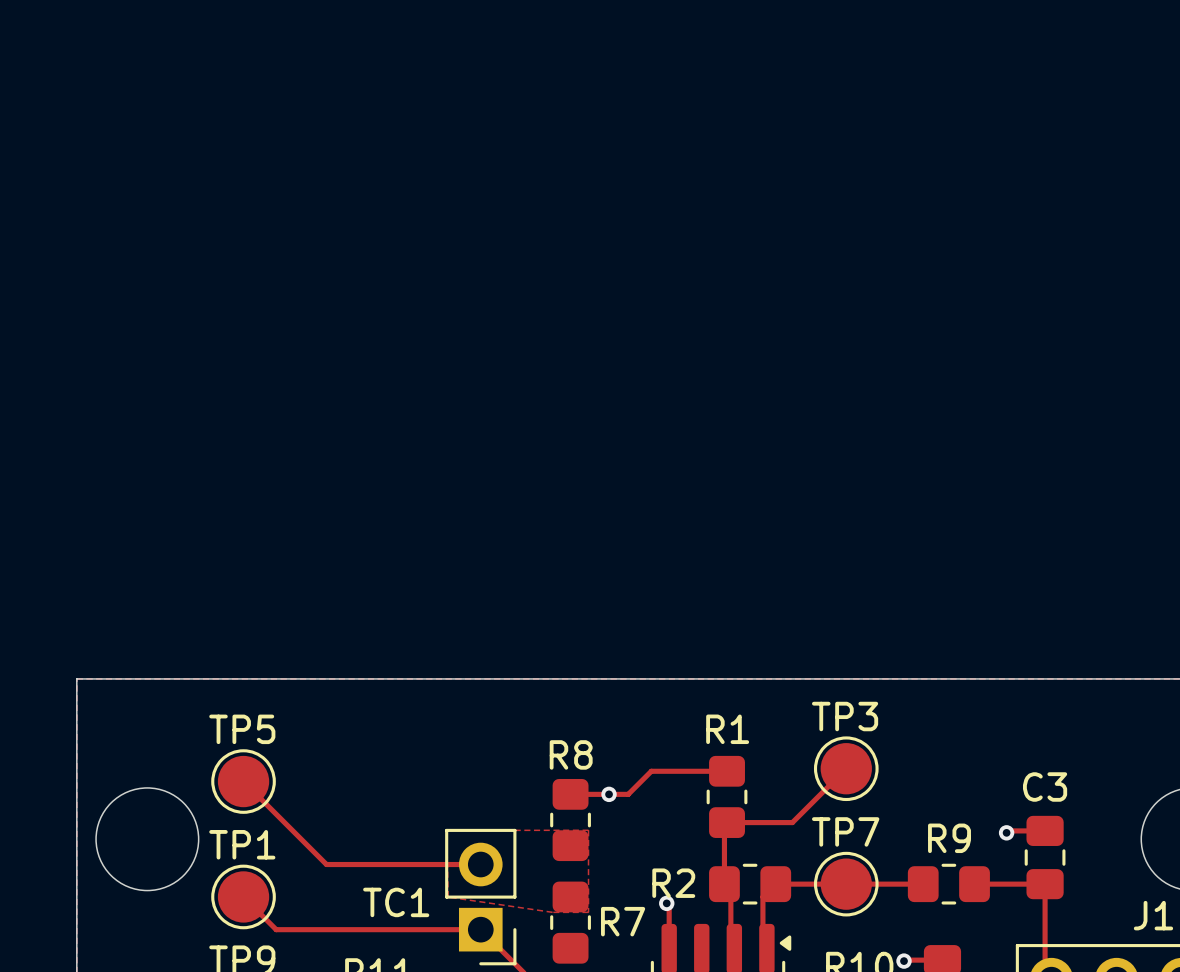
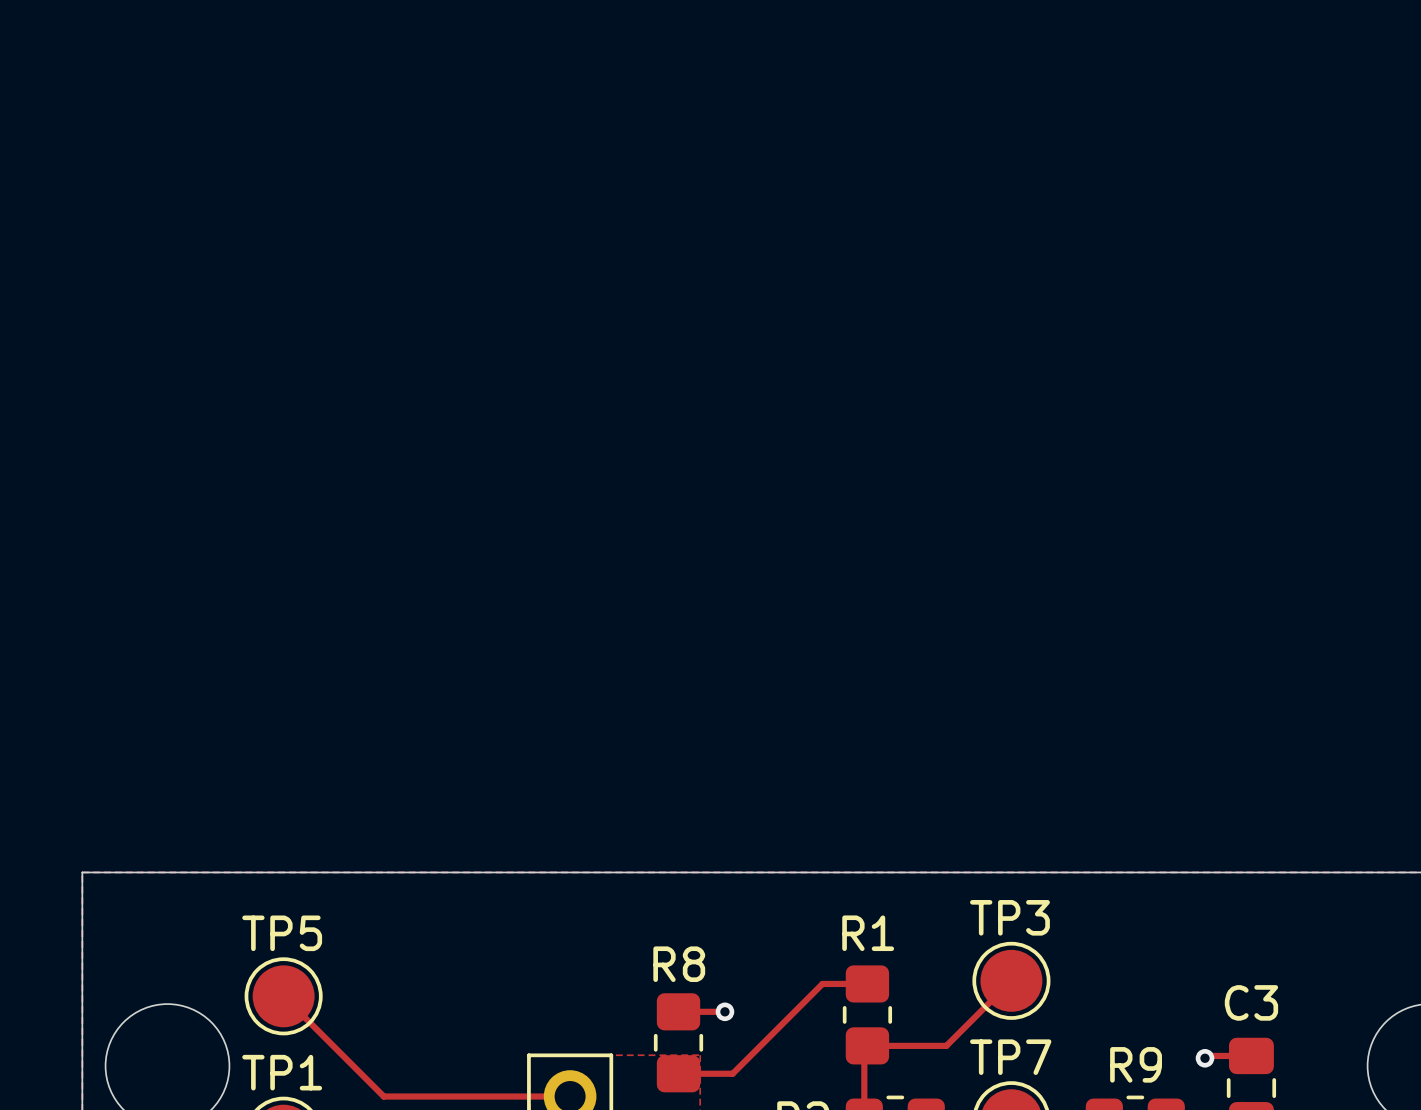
top track: (689, 771) (651, 771) (628, 794) (609, 794) -> (822, 983) (732, 1073) (678, 1073)

